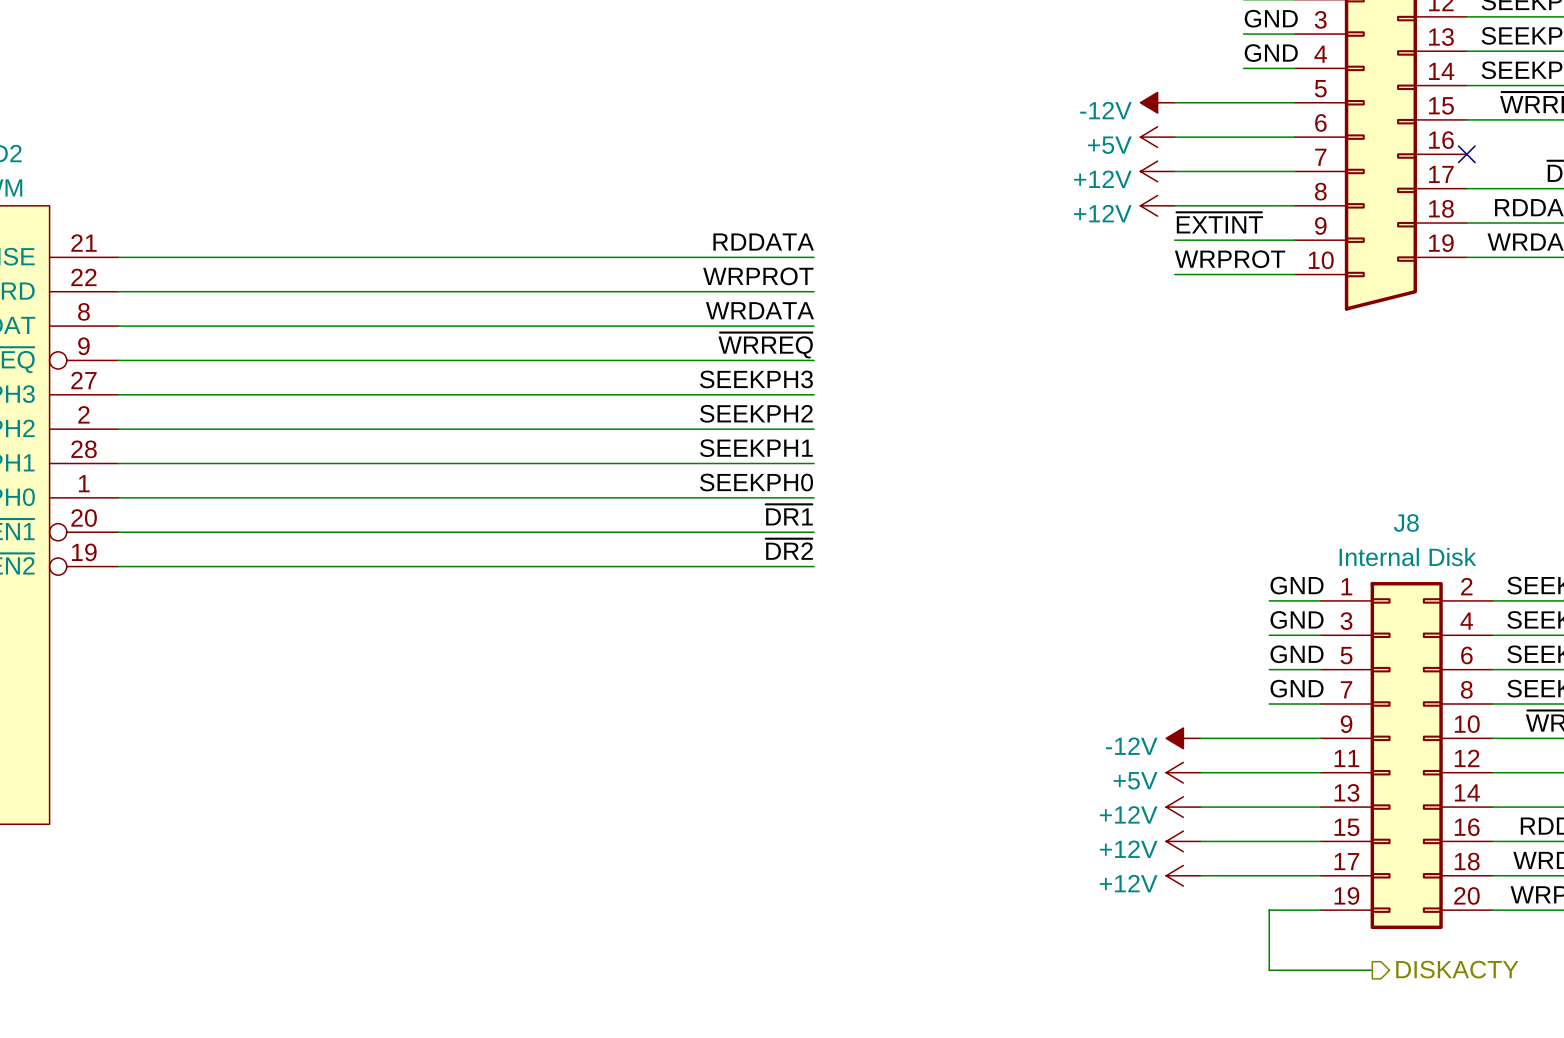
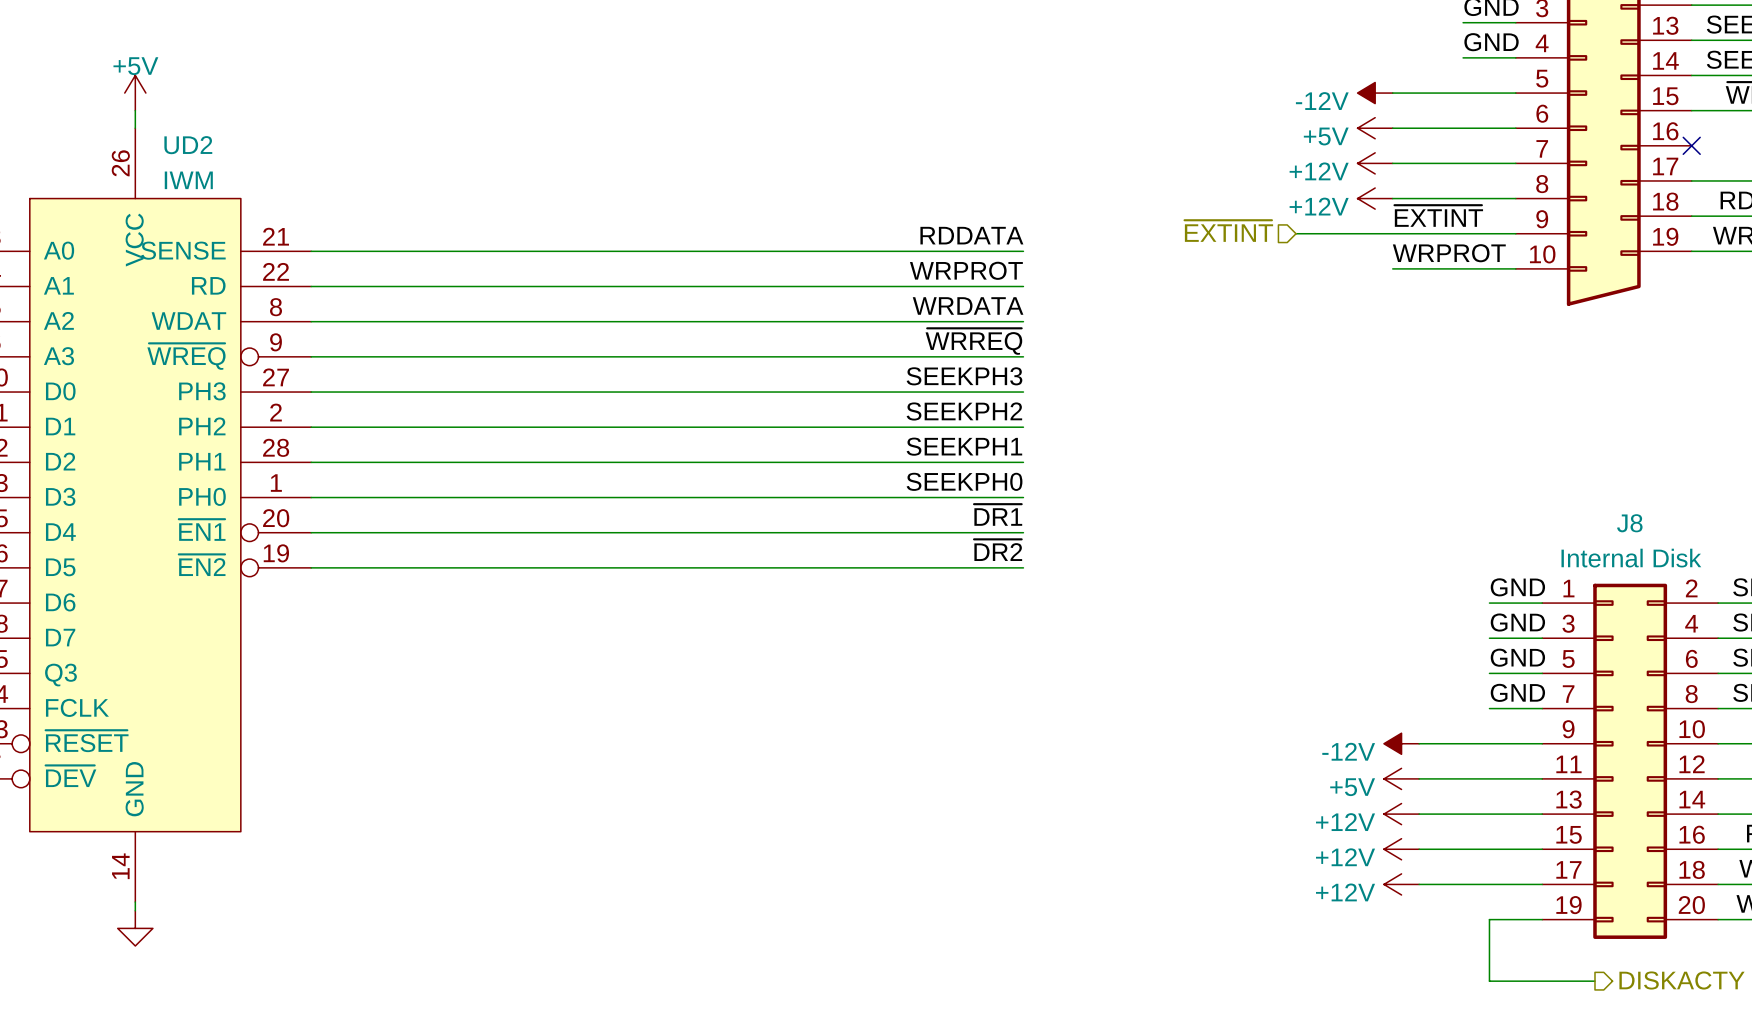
hierarchical label: none -> ~{EXTINT} (1228, 231)
wire: none -> (1296, 233) (1392, 233)

